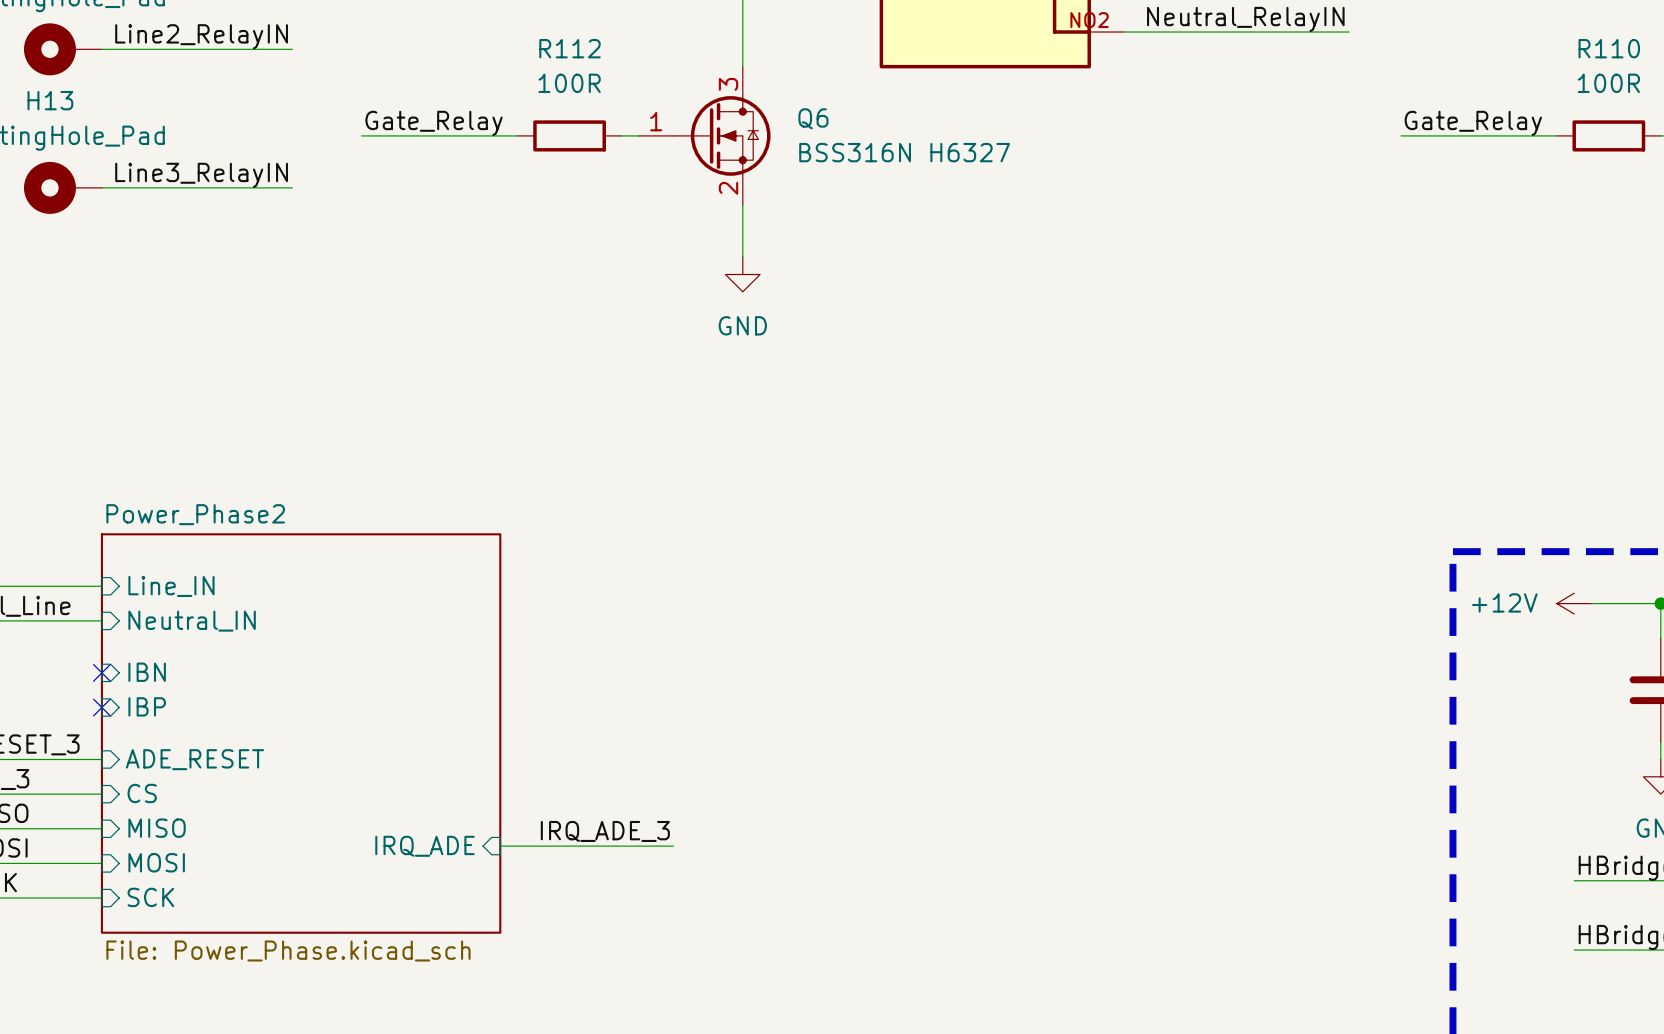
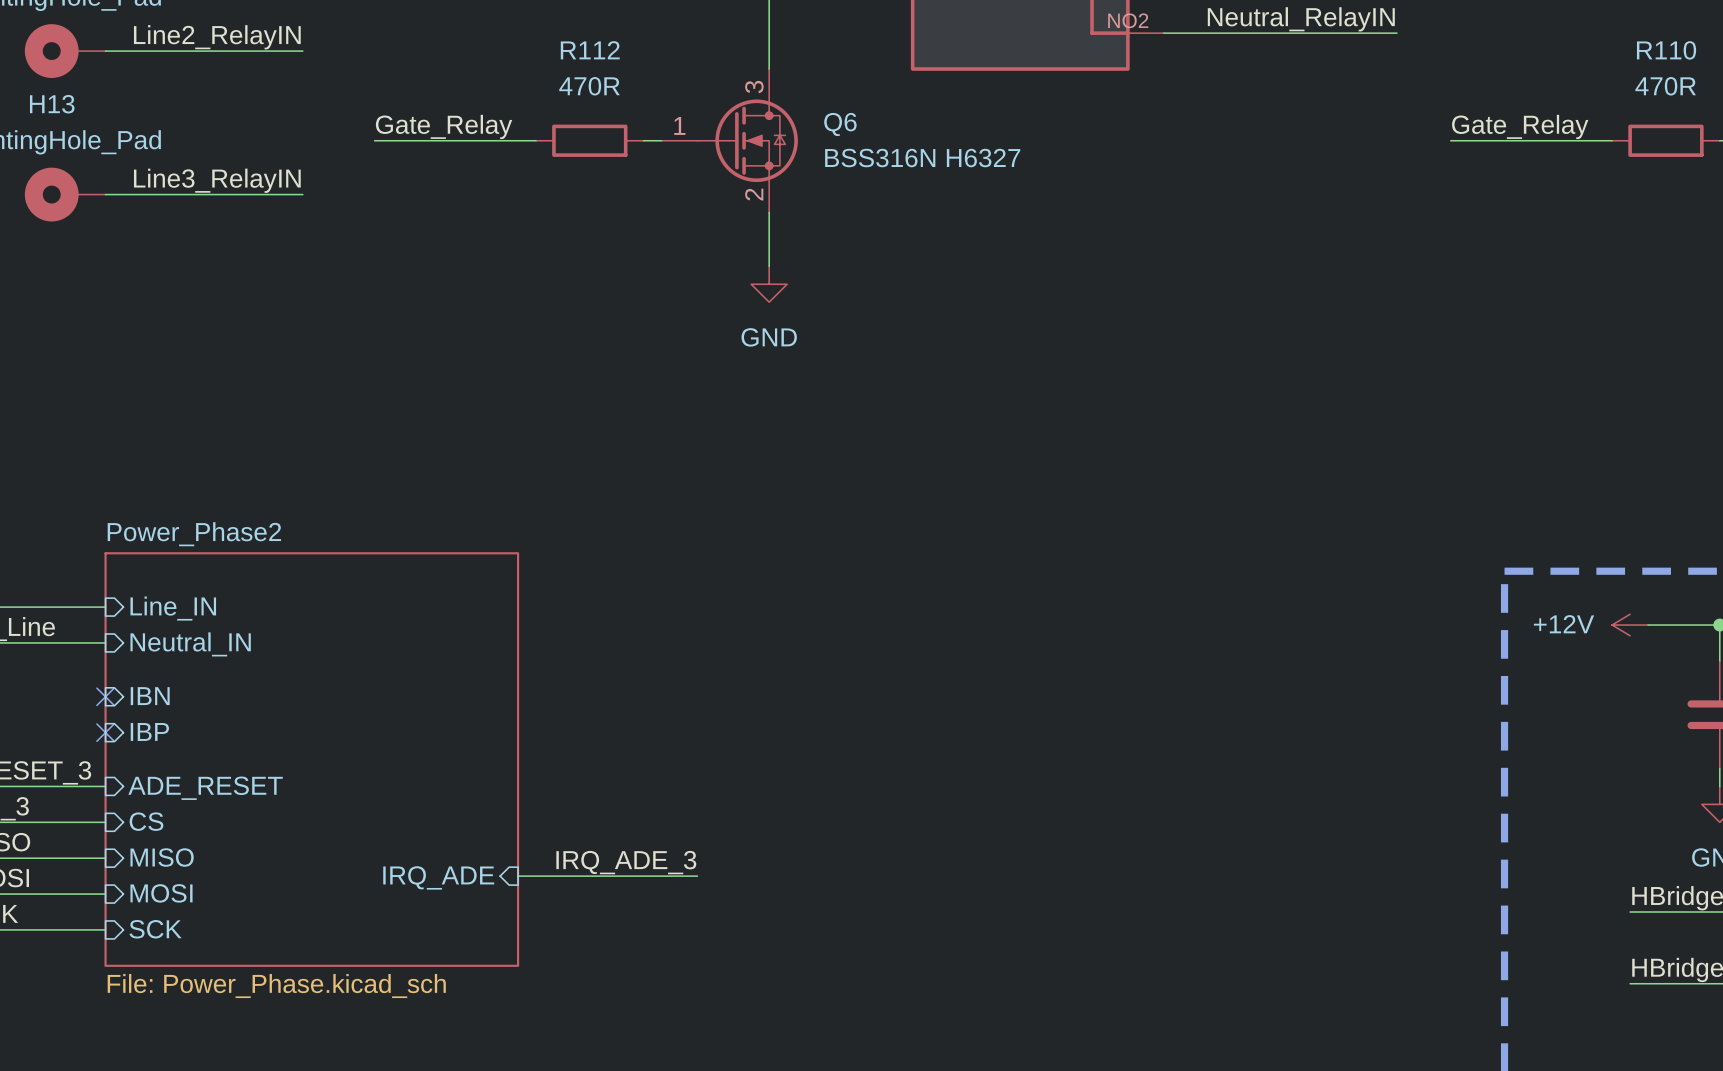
R112 value: 100R (569, 83) -> 470R (589, 86)
R110 value: 100R (1608, 83) -> 470R (1665, 86)

